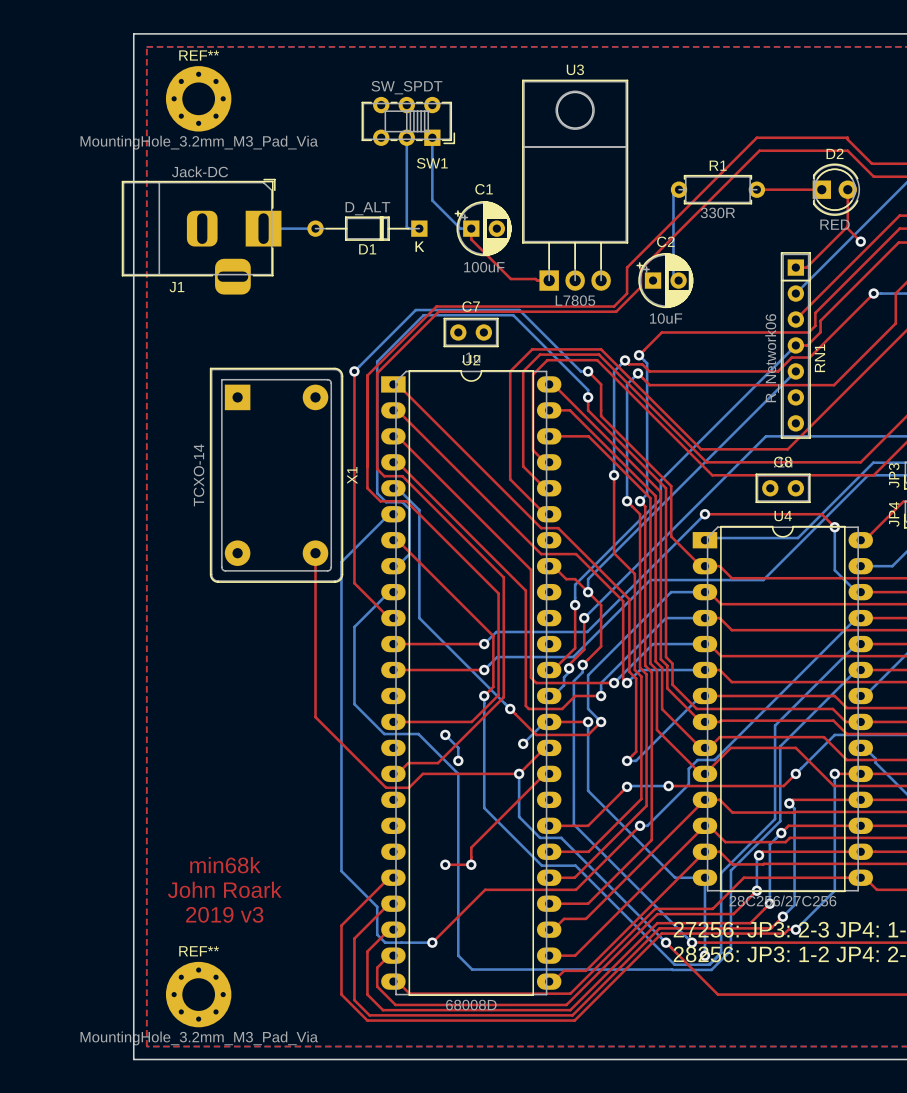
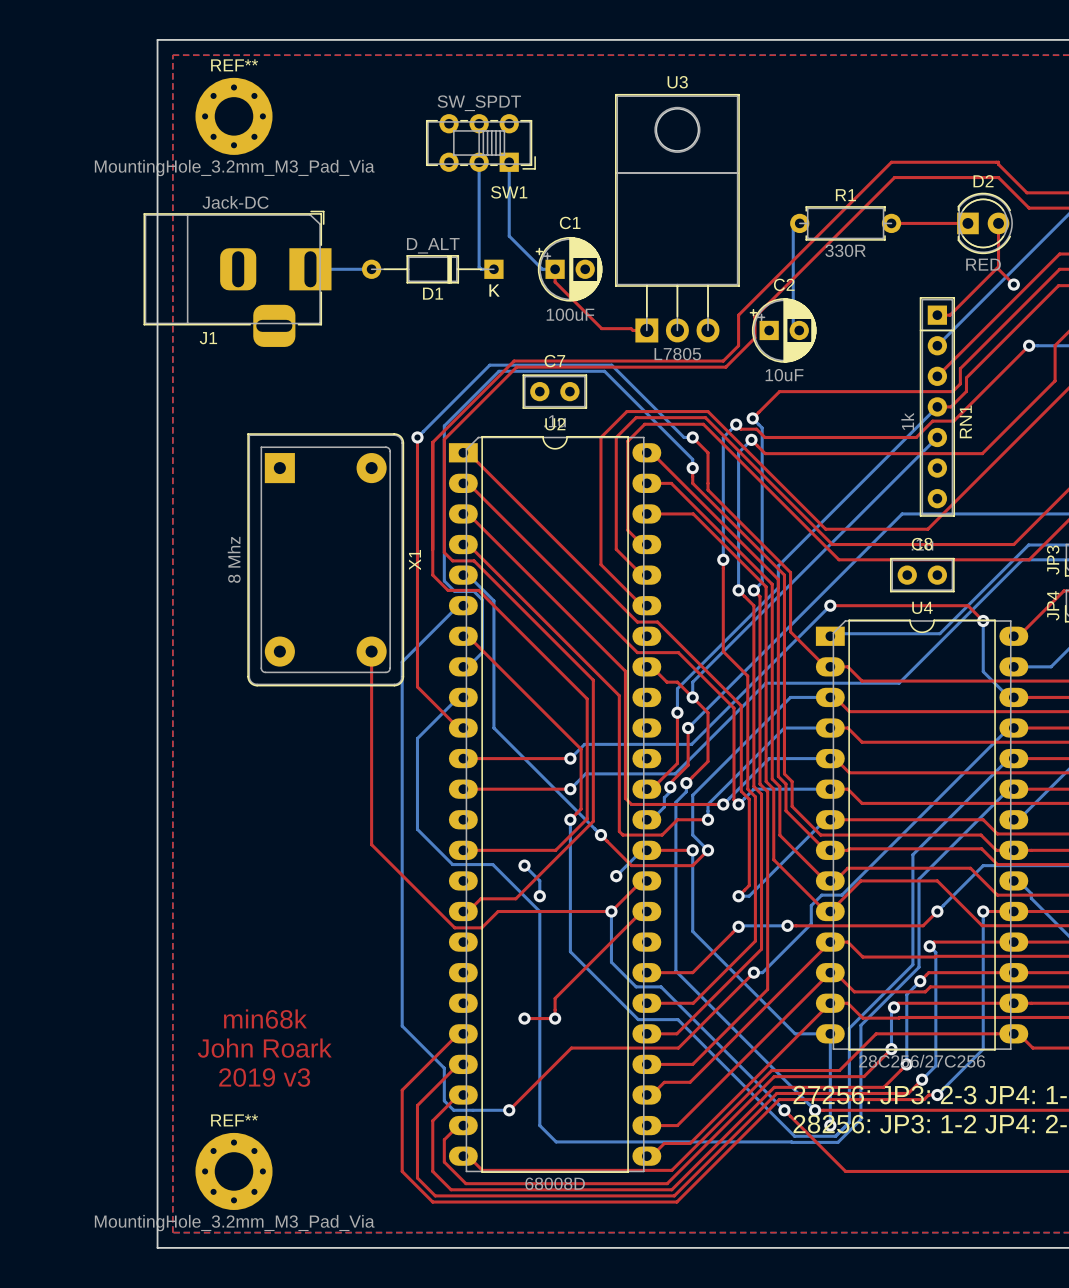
RN1 value: R_Network06 (772, 358) -> 1k (907, 421)
X1 value: TCXO-14 (198, 475) -> 8 Mhz (234, 559)

